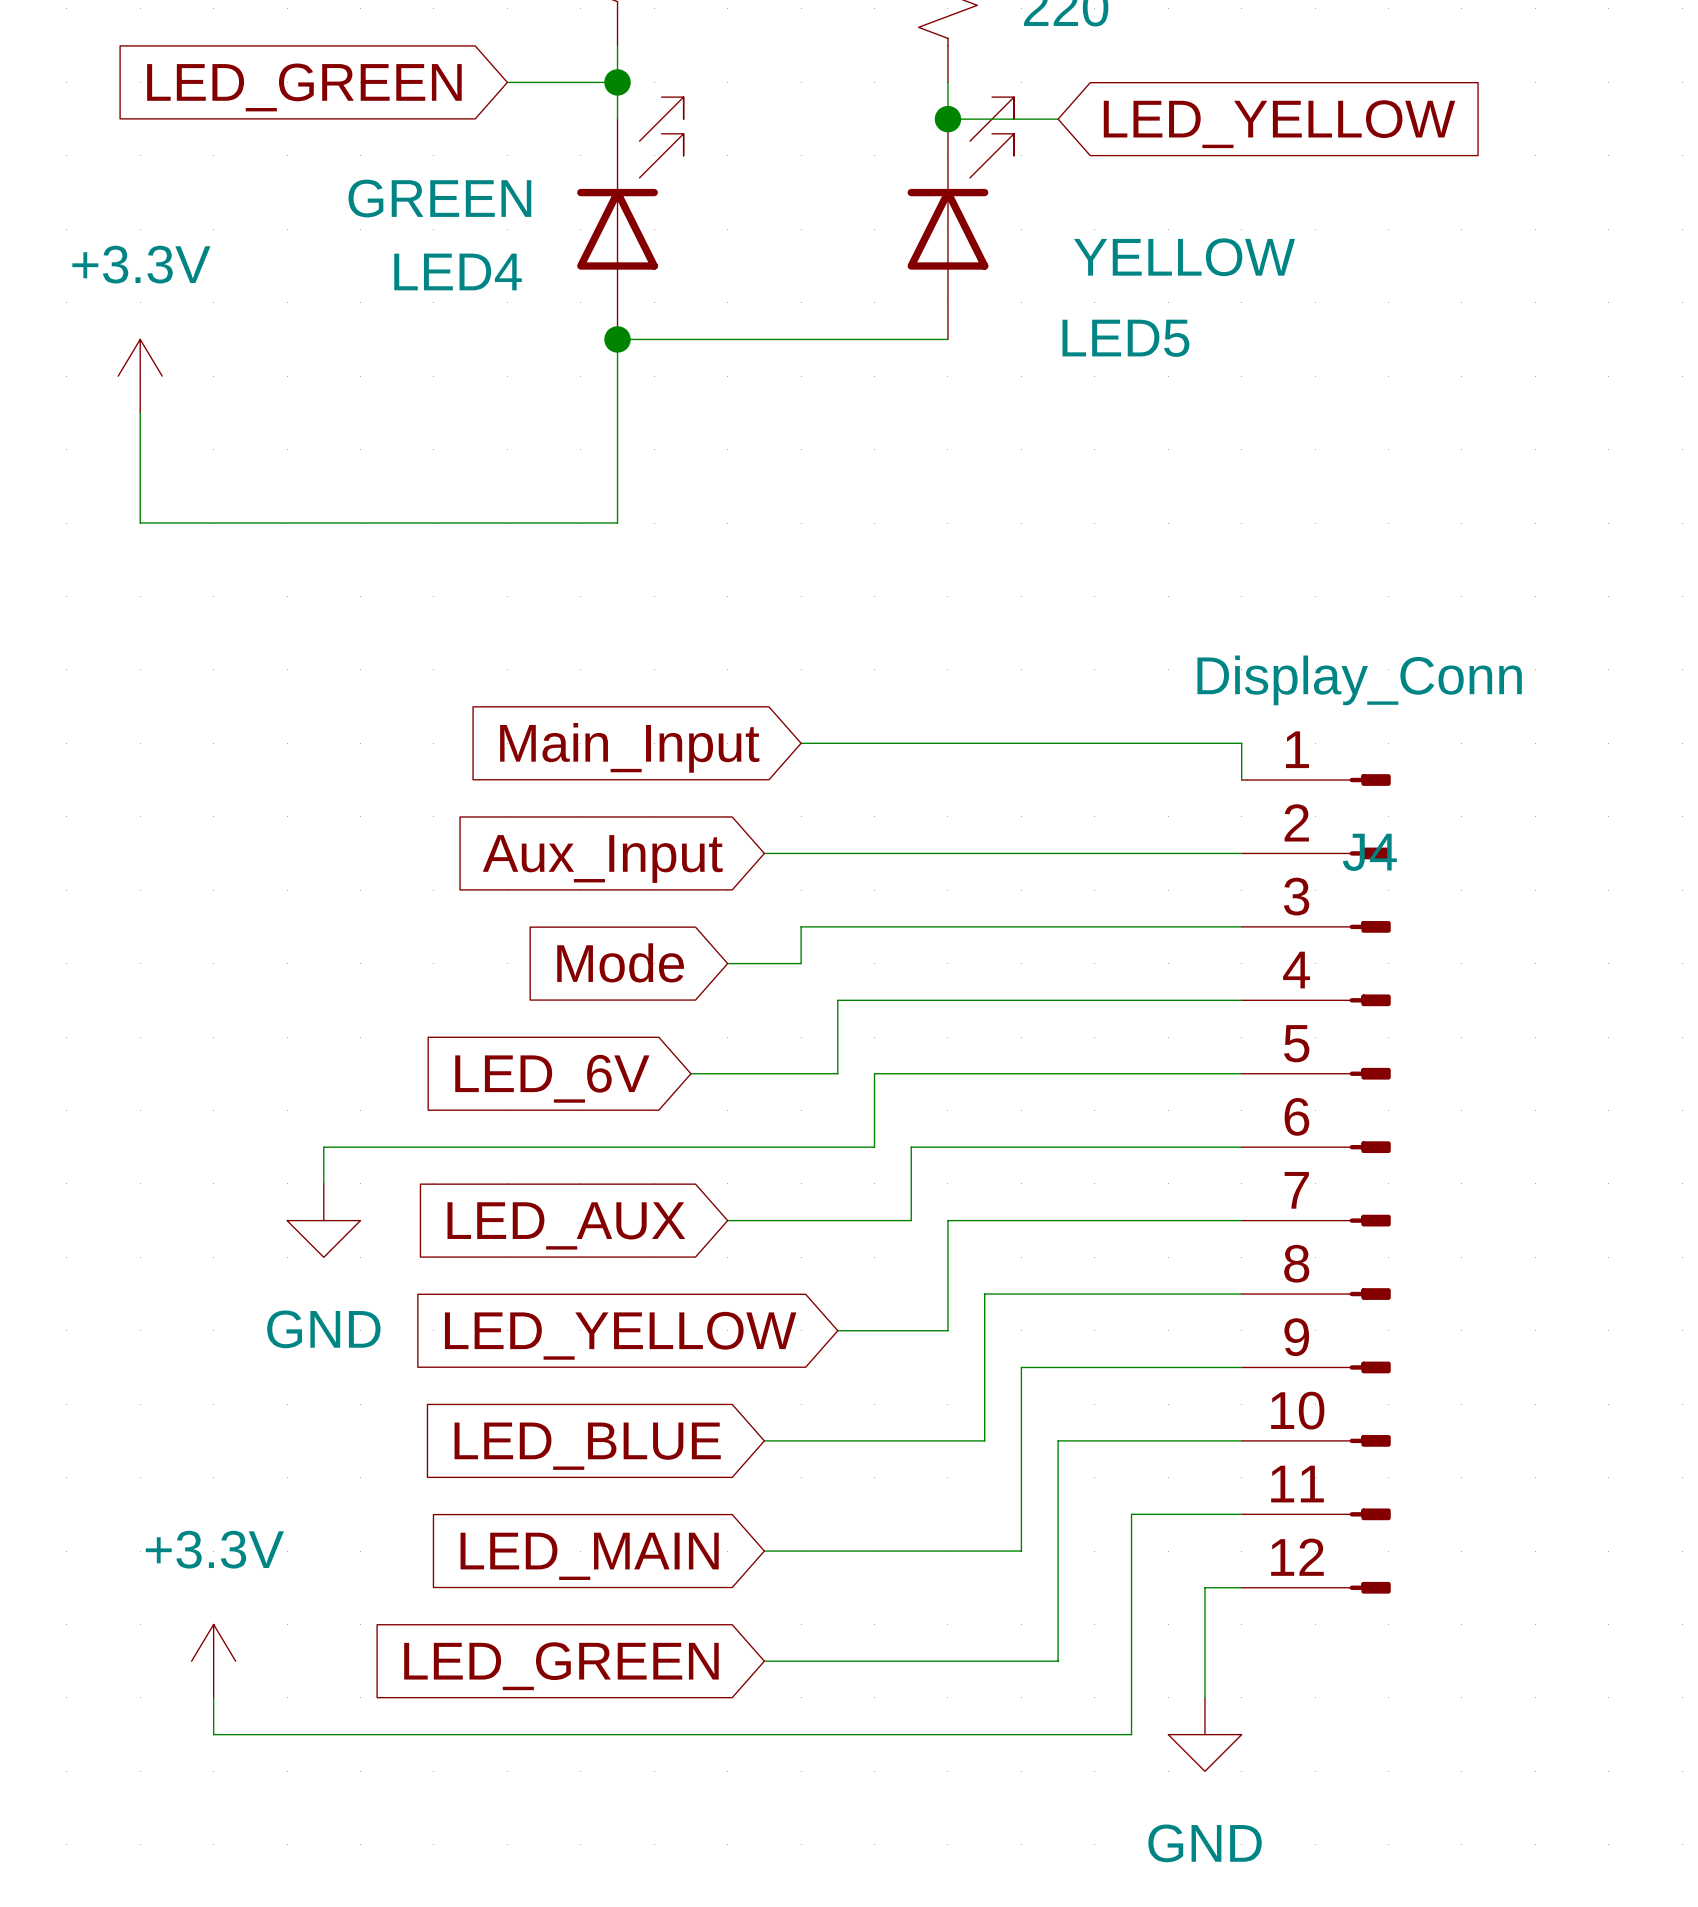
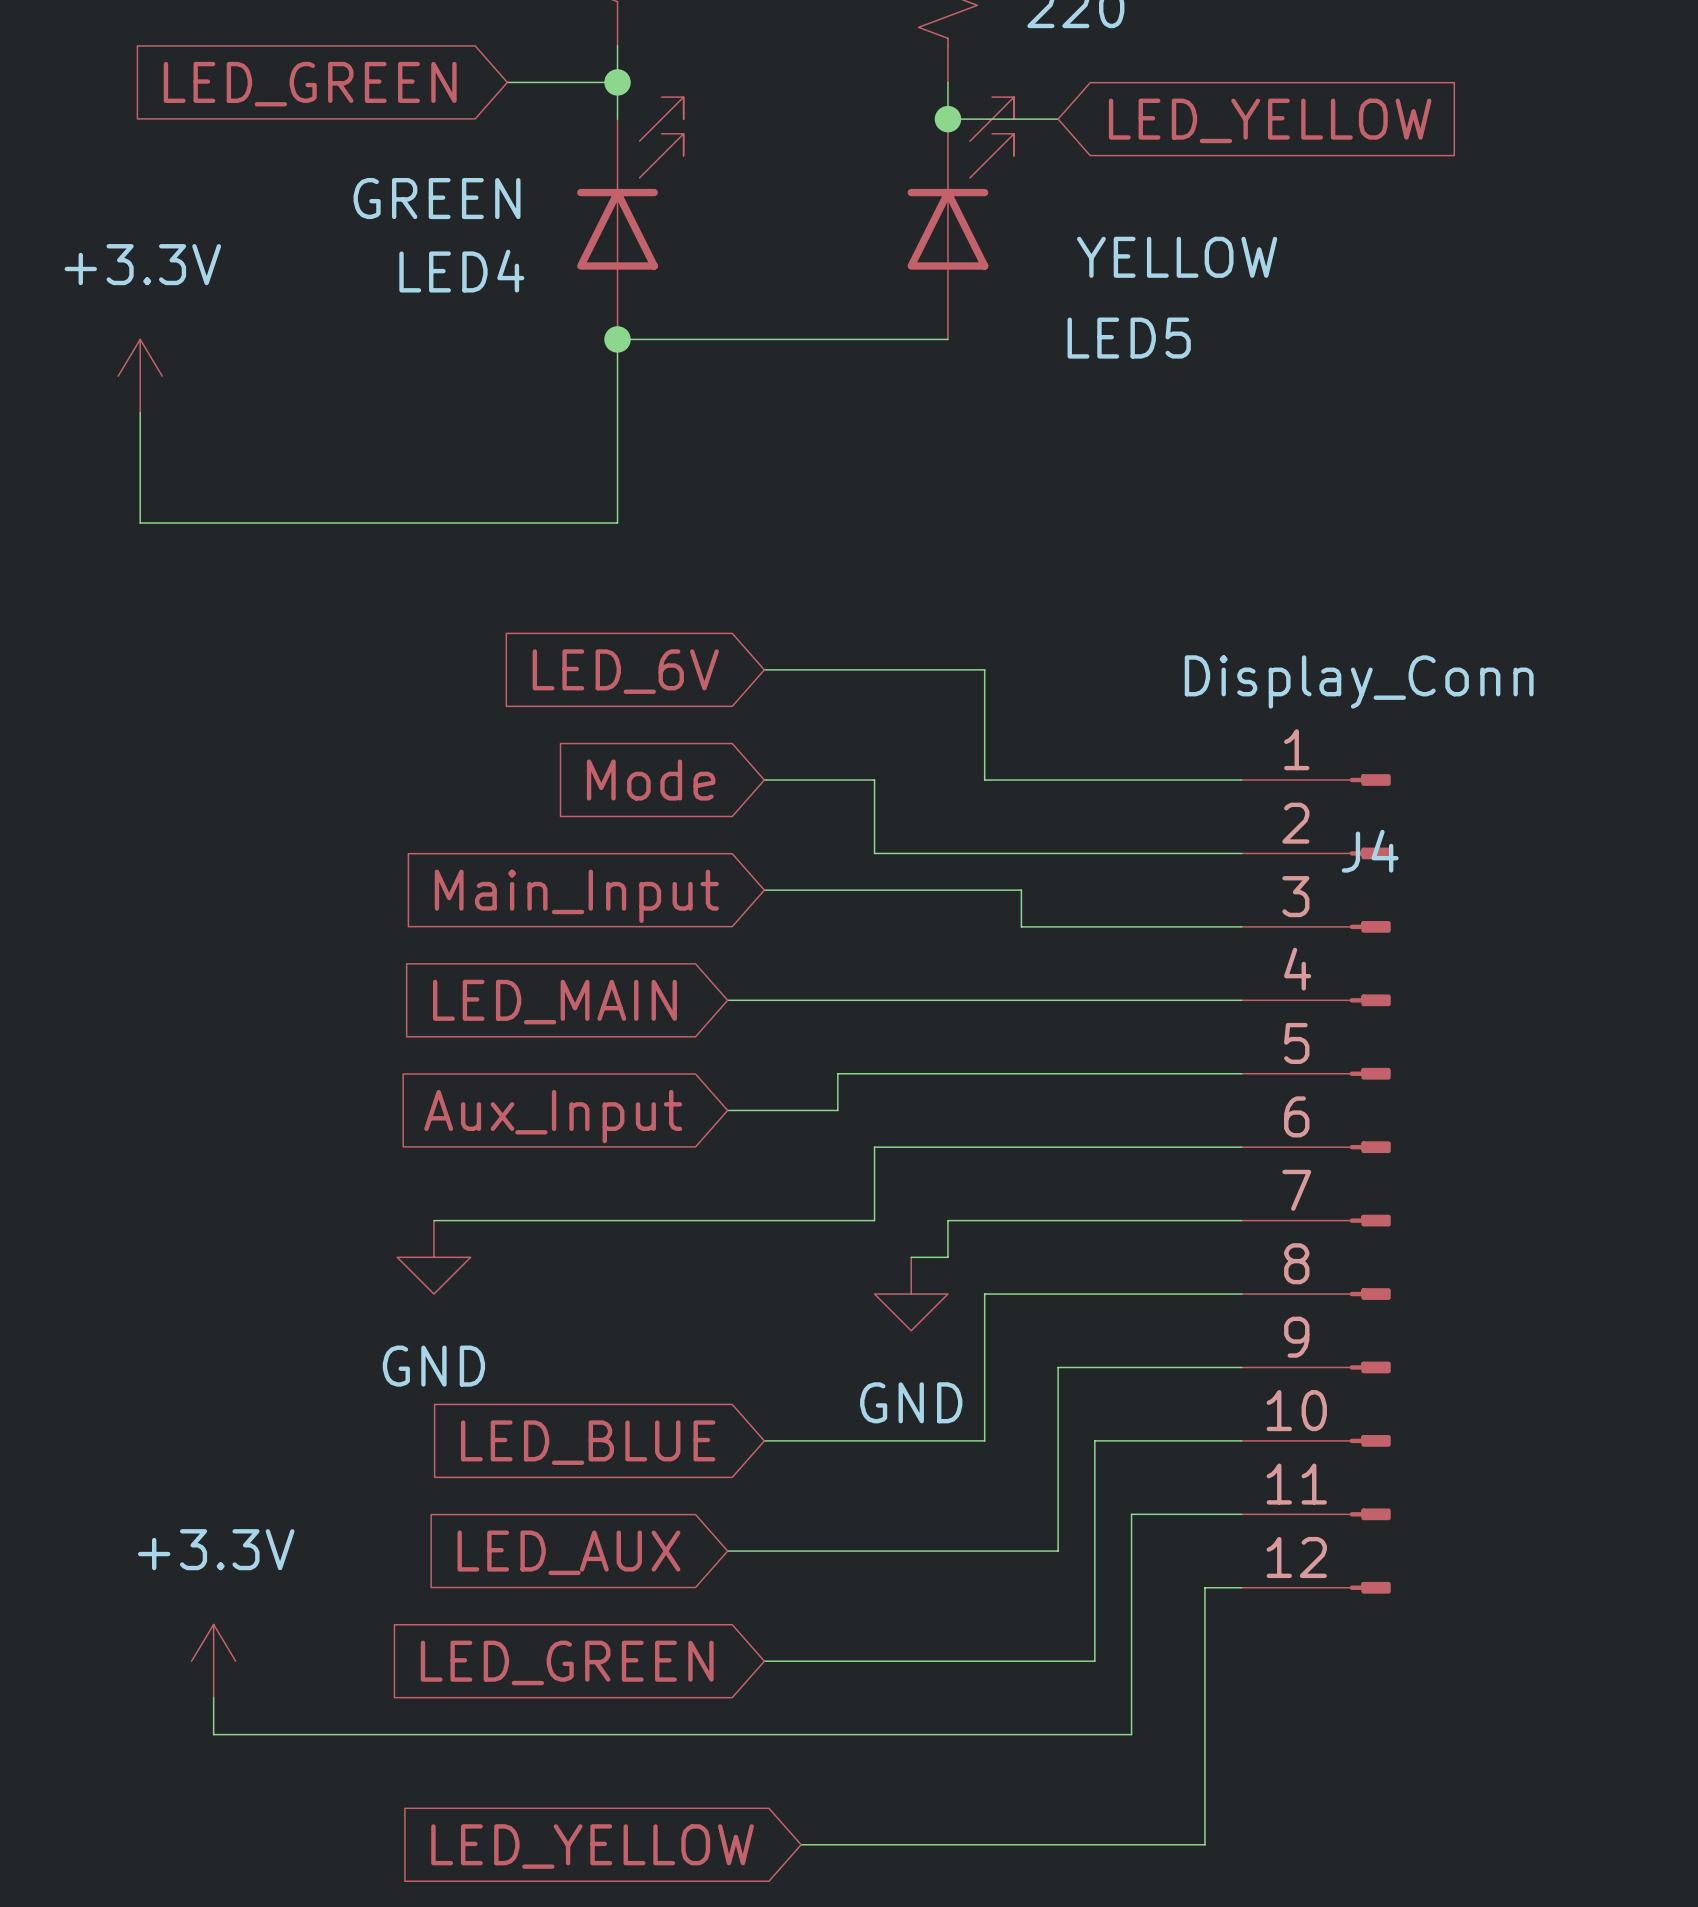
wire: (801, 743) (1241, 743) (1241, 780) -> (764, 669) (984, 669) (984, 780) (1241, 780)
global label position: Main_Input (629, 747) -> Main_Input (576, 896)
wire: (764, 853) (874, 853) -> (764, 780) (874, 780) (874, 853)
global label position: Aux_Input (602, 858) -> Aux_Input (553, 1116)
wire: (1021, 926) (801, 926) (801, 963) (727, 963) -> (1021, 926) (1021, 890) (764, 890)
global label position: Mode (620, 962) -> Mode (651, 780)
wire: (837, 1000) (837, 1073) (690, 1073) -> (837, 1000) (727, 1000)
wire: (874, 1073) (874, 1147) (323, 1147) (323, 1183) -> (874, 1073) (837, 1073) (837, 1110) (727, 1110)
global label position: LED_6V (552, 1078) -> LED_6V (625, 671)
wire: (911, 1147) (911, 1220) (874, 1220) -> (911, 1147) (874, 1147) (874, 1220)
power symbol position: GND (323, 1220) -> GND (433, 1257)
wire: none -> (433, 1220) (727, 1220)
global label position: LED_AUX (566, 1225) -> LED_AUX (568, 1552)
wire: (947, 1257) (947, 1330) (837, 1330) -> (947, 1257) (911, 1257)
power symbol: none -> GND (911, 1294)
global label position: LED_YELLOW (620, 1335) -> LED_YELLOW (592, 1846)
wire: (1058, 1367) (1021, 1367) (1021, 1551) -> none
wire: (1058, 1440) (1094, 1440) -> (1058, 1440) (1058, 1367)
wire: none -> (1094, 1440) (1094, 1661) (1058, 1661)
wire: none -> (727, 1551) (764, 1551)
wire: (1058, 1551) (1058, 1661) -> (1058, 1551) (1021, 1551)
global label position: LED_MAIN (589, 1556) -> LED_MAIN (554, 1002)
wire: none -> (1204, 1697) (1204, 1844) (801, 1844)
power symbol: GND (1204, 1734) -> none

